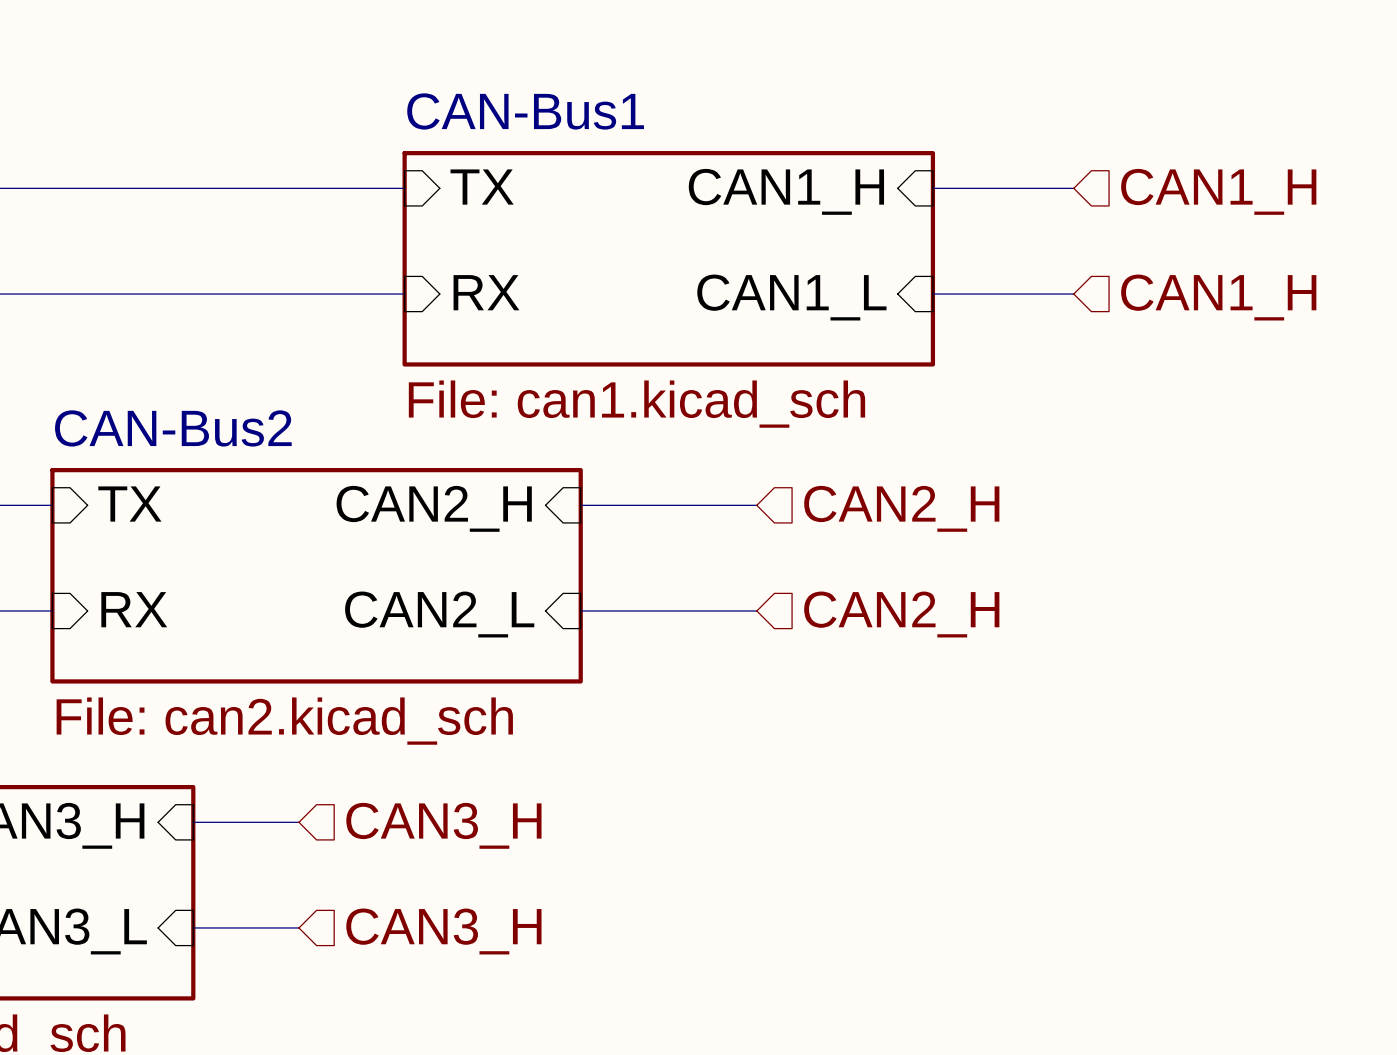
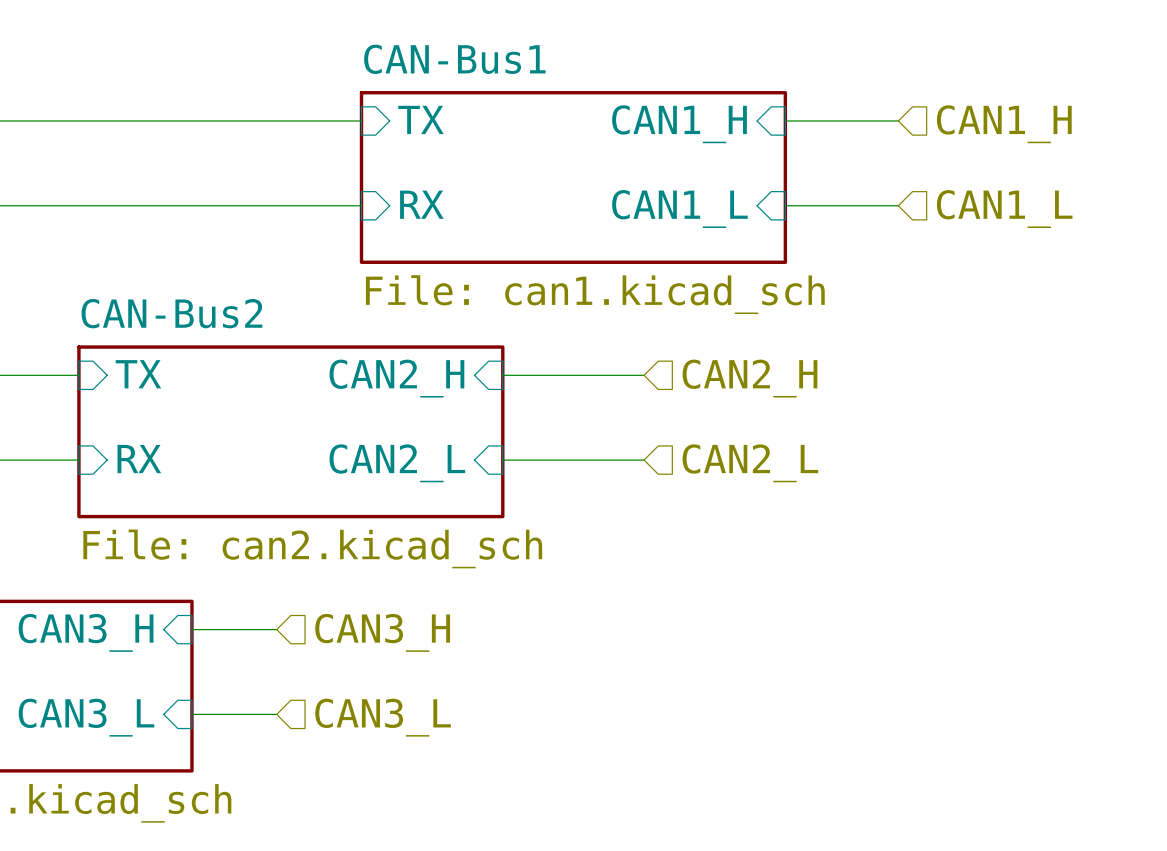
hierarchical label: CAN1_H (1218, 297) -> CAN1_L (1004, 209)
hierarchical label: CAN2_H (901, 614) -> CAN2_L (750, 463)
hierarchical label: CAN3_H (443, 931) -> CAN3_L (383, 717)

